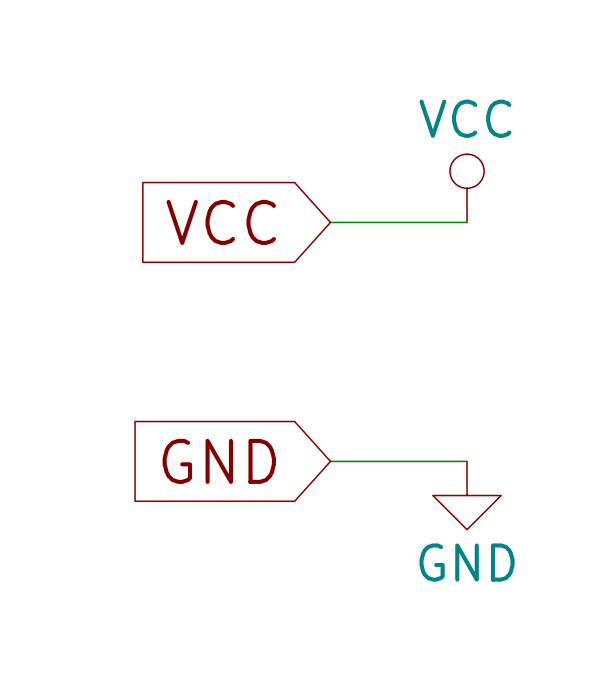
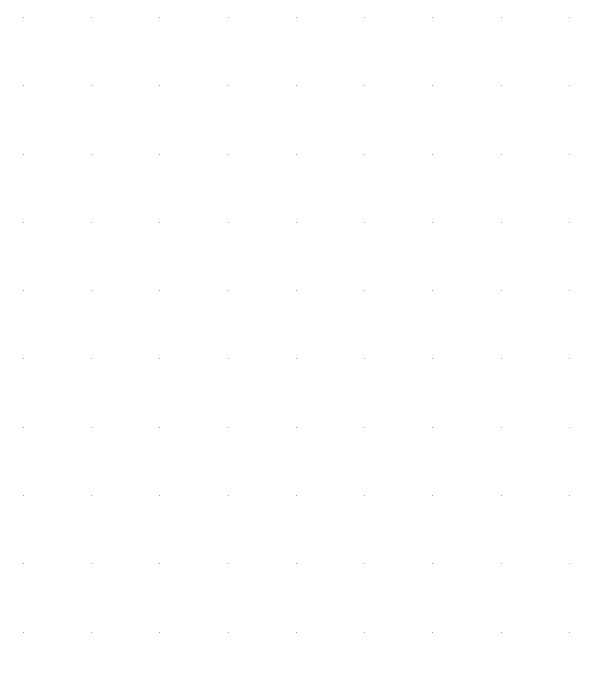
power symbol: VCC (467, 188) -> none
global label: VCC (221, 222) -> none
wire: (330, 222) (467, 222) -> none
global label: GND (219, 461) -> none
wire: (330, 461) (467, 461) -> none
power symbol: GND (467, 495) -> none

